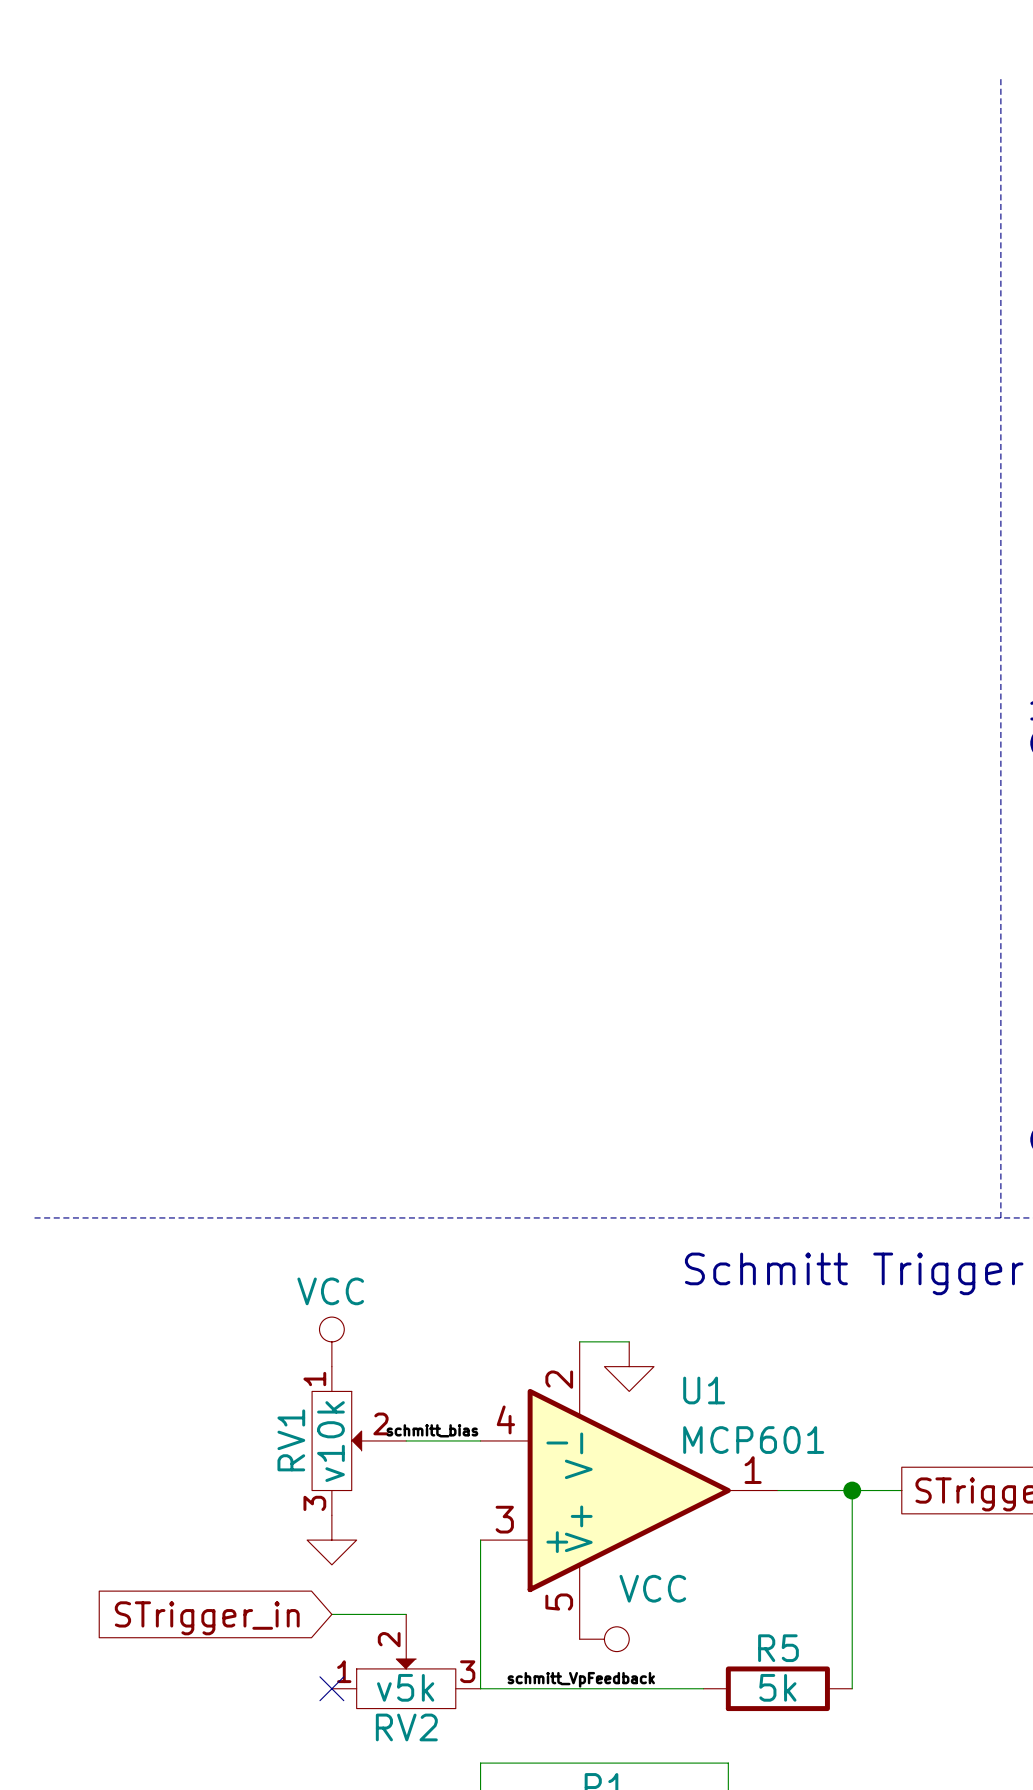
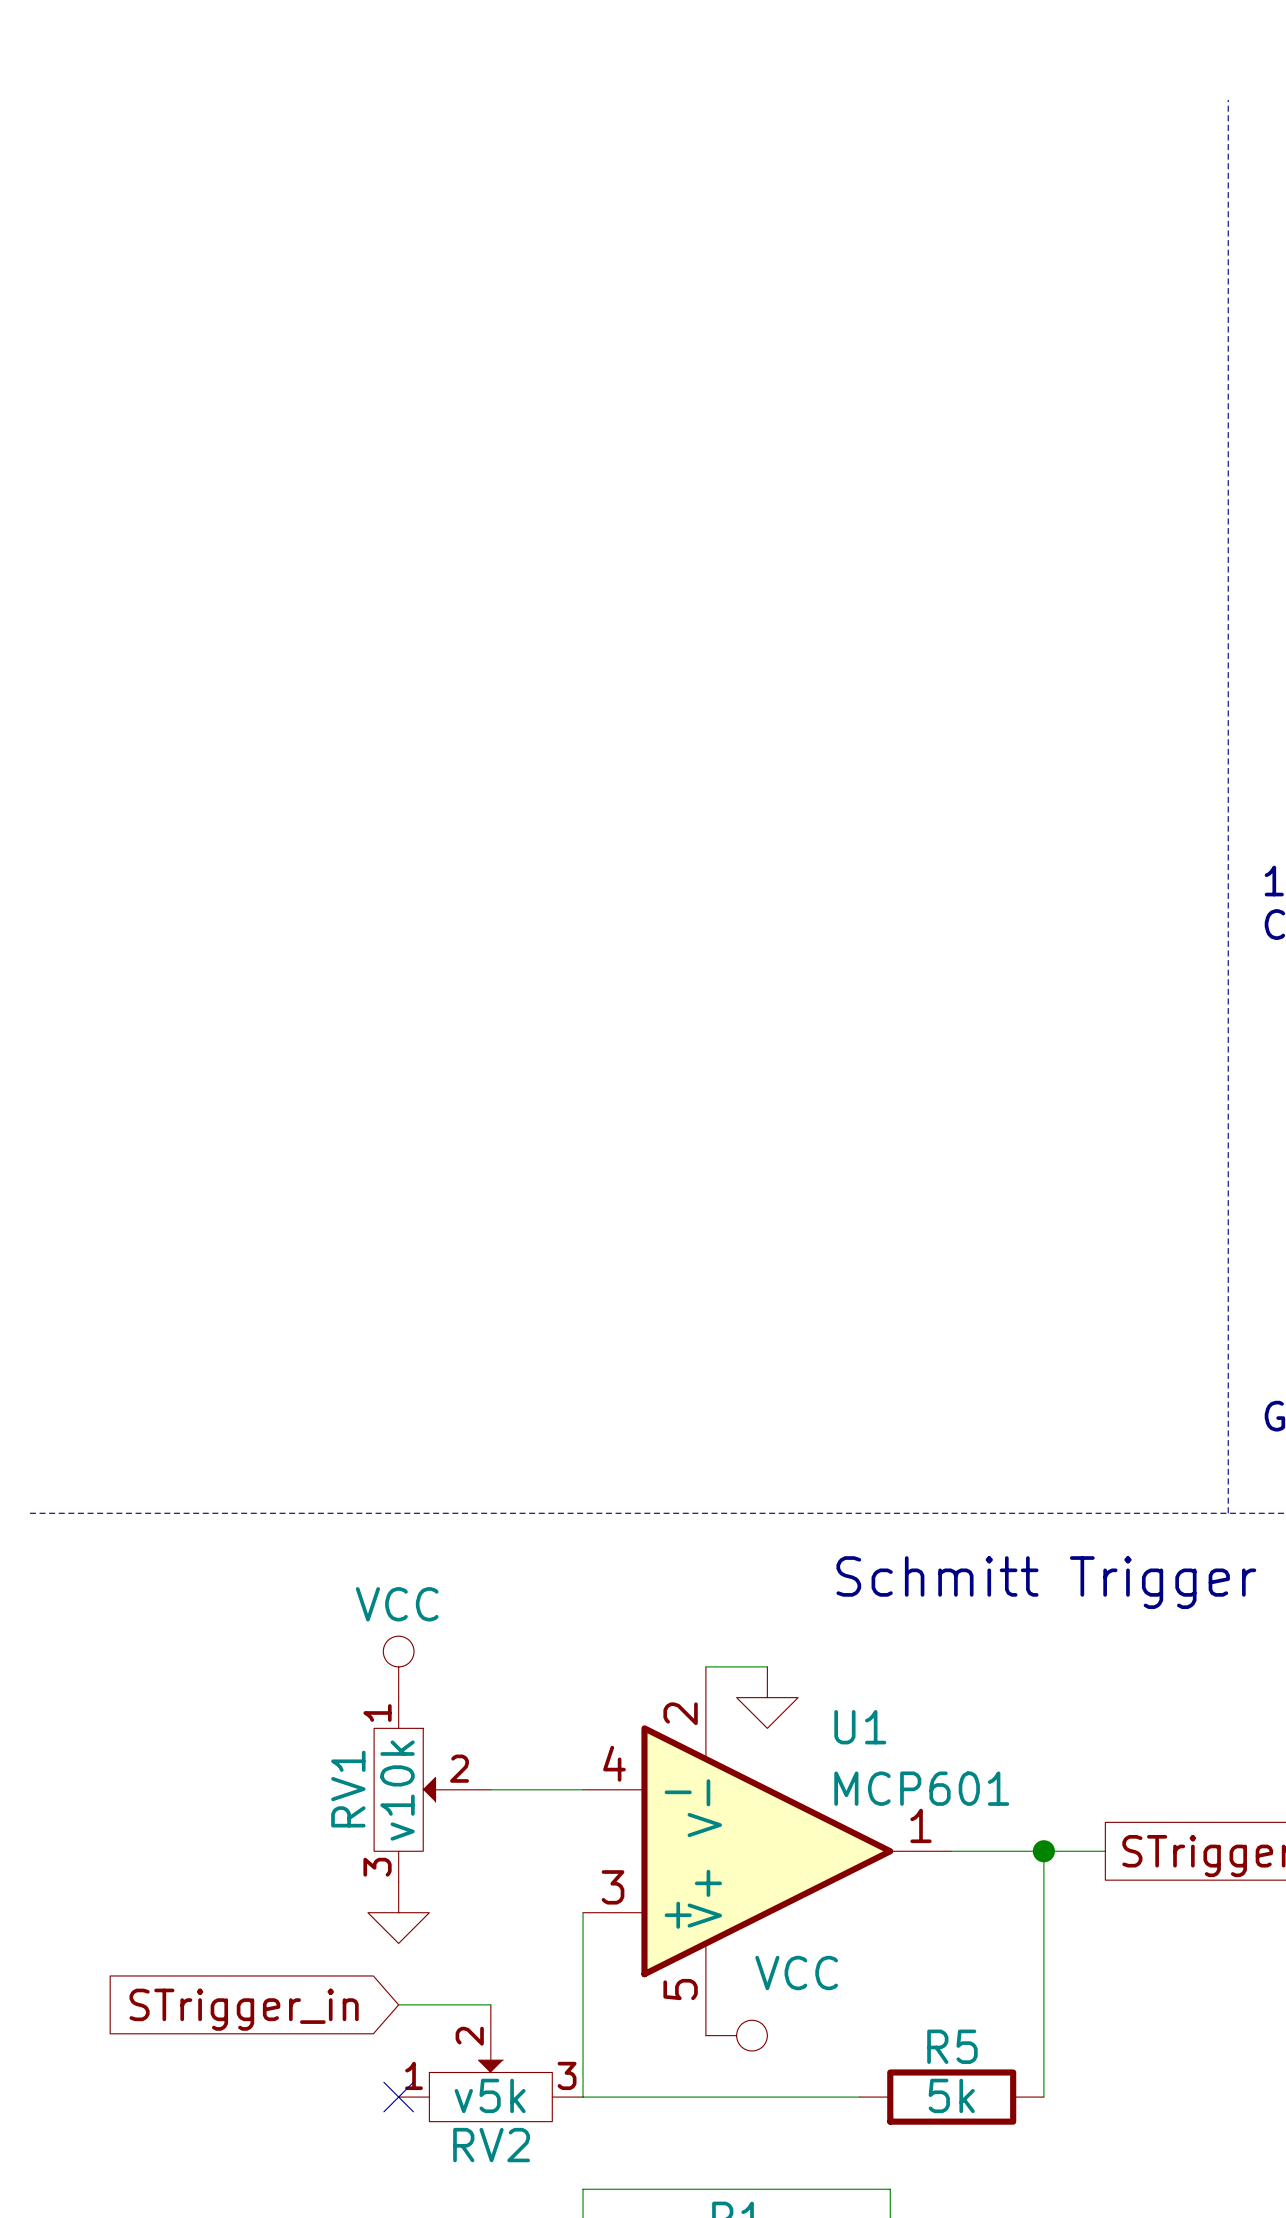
label: schmitt_bias (432, 1430) -> none
label: schmitt_VpFeedback (581, 1679) -> none

